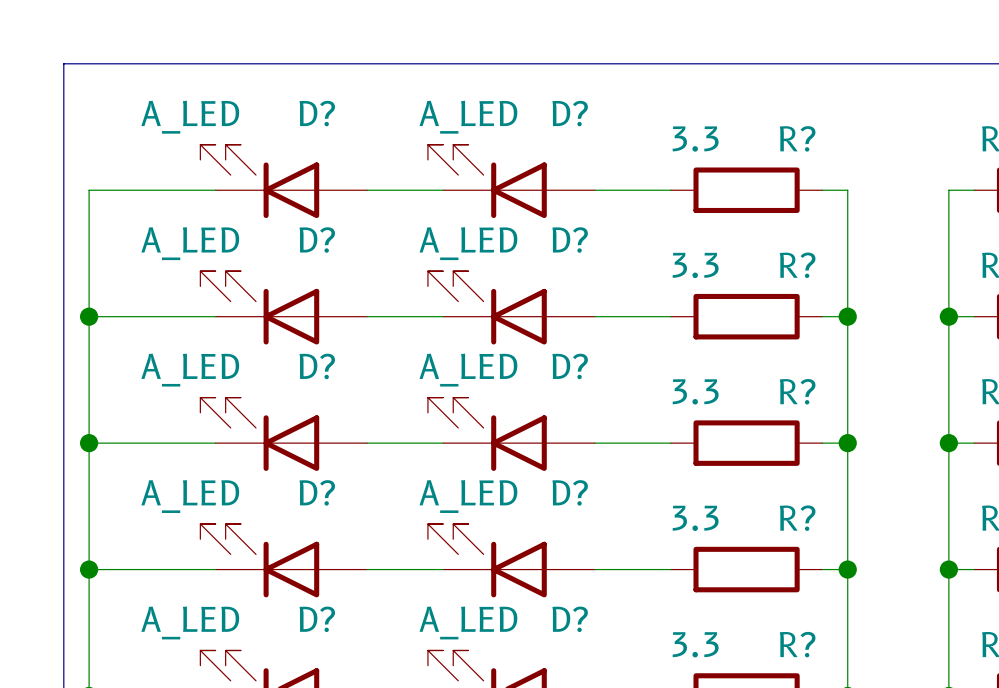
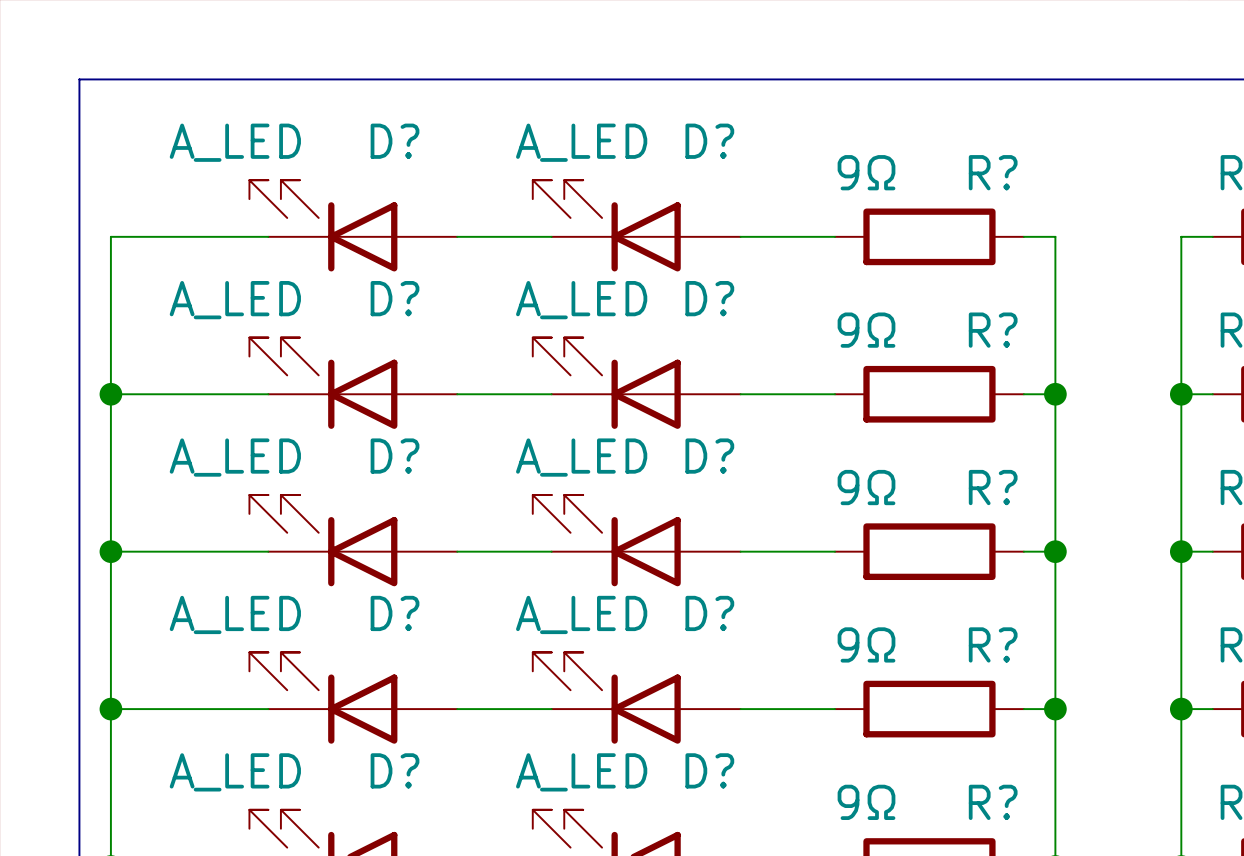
R? value: 3.3 (695, 139) -> 9Ω (866, 172)
R? value: 3.3 (695, 265) -> 9Ω (866, 330)
R? value: 3.3 (695, 391) -> 9Ω (866, 487)
R? value: 3.3 (695, 518) -> 9Ω (866, 644)
R? value: 3.3 (695, 644) -> 9Ω (866, 802)

